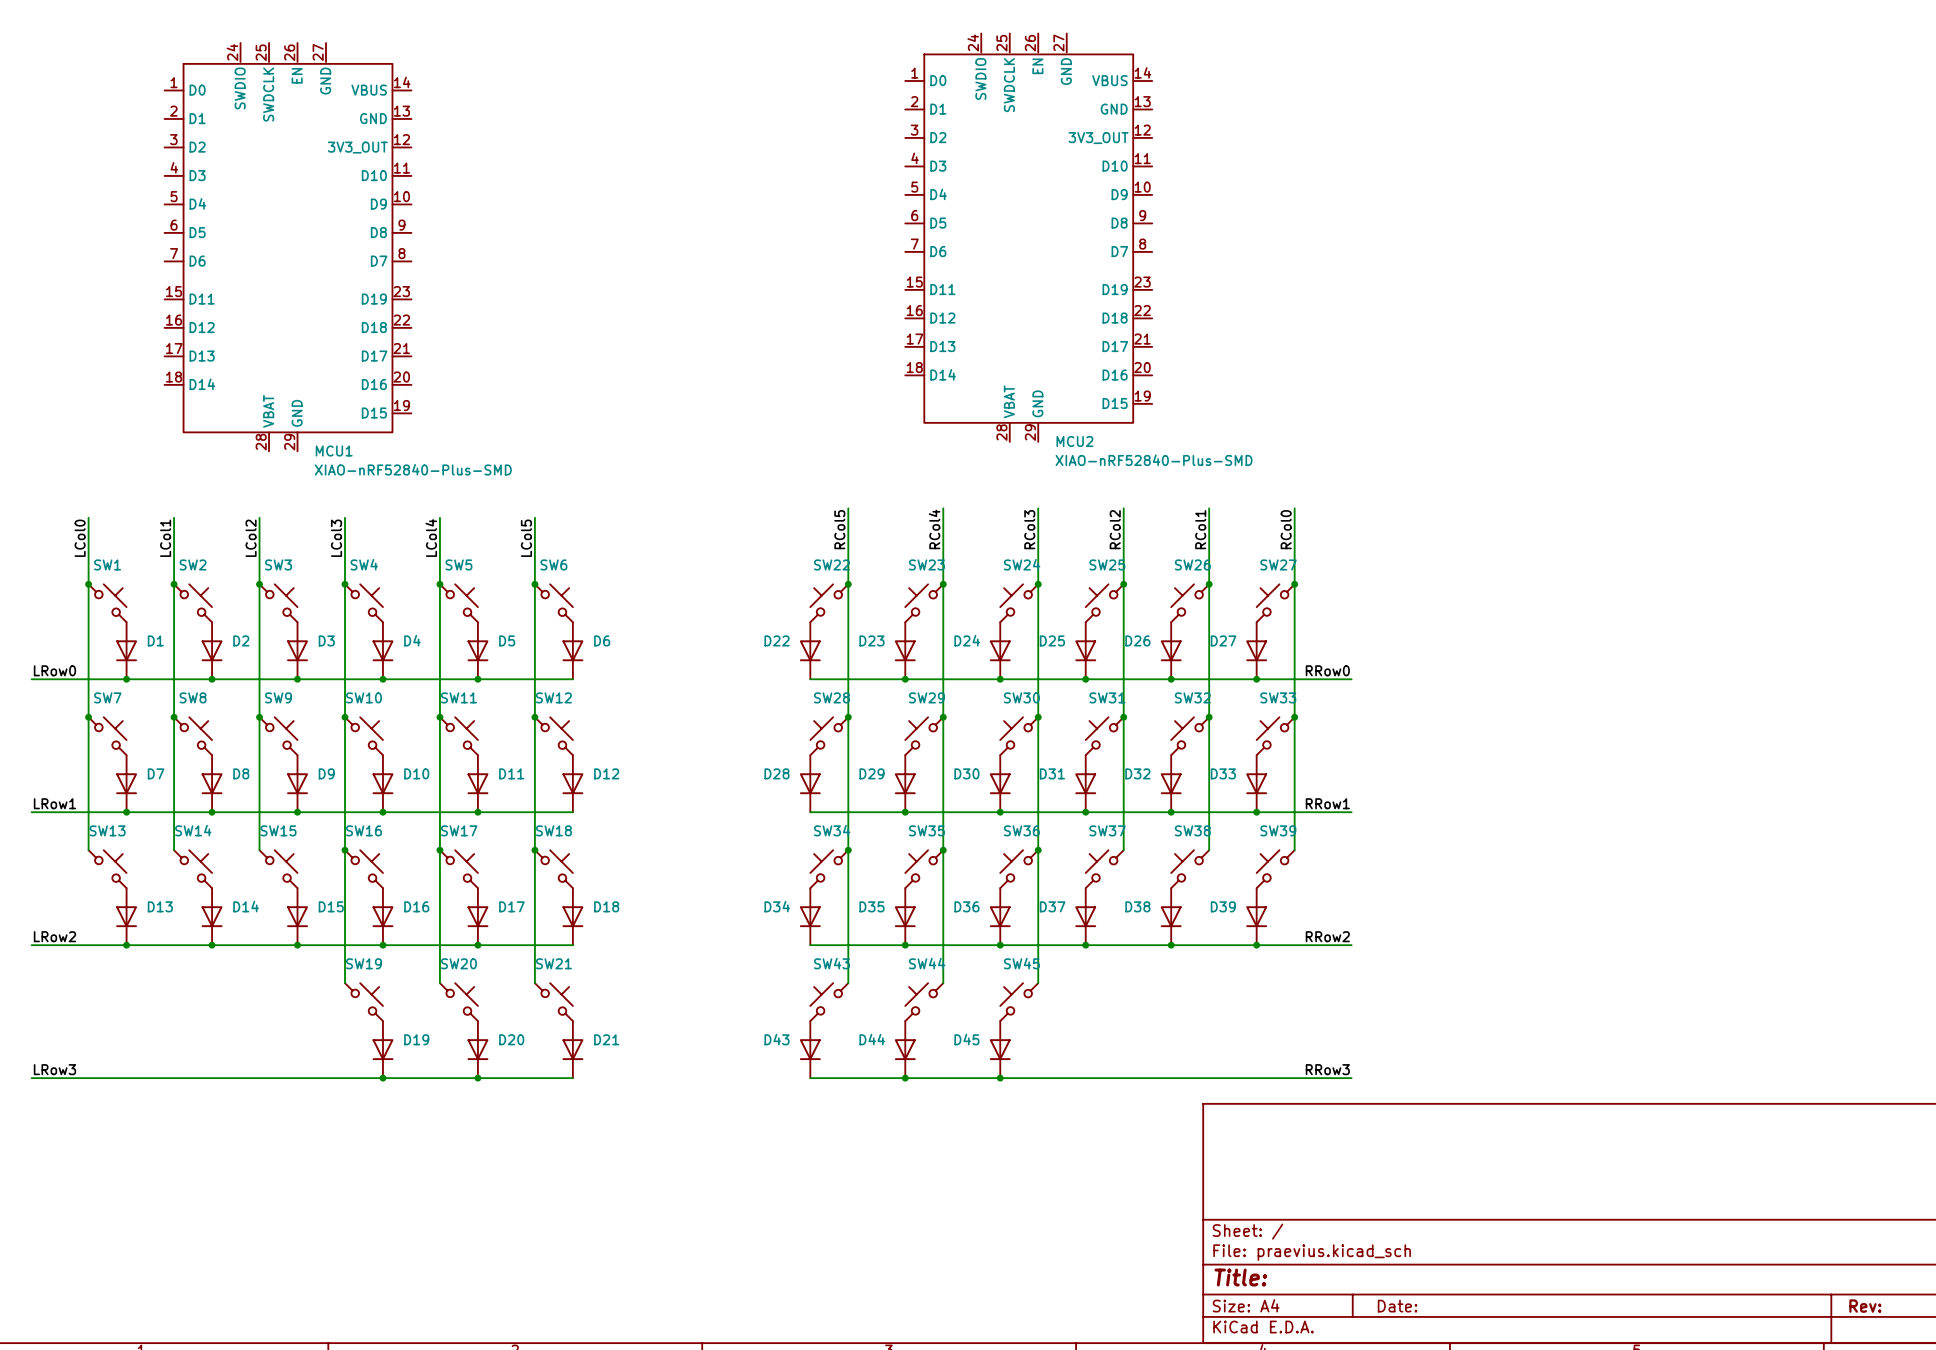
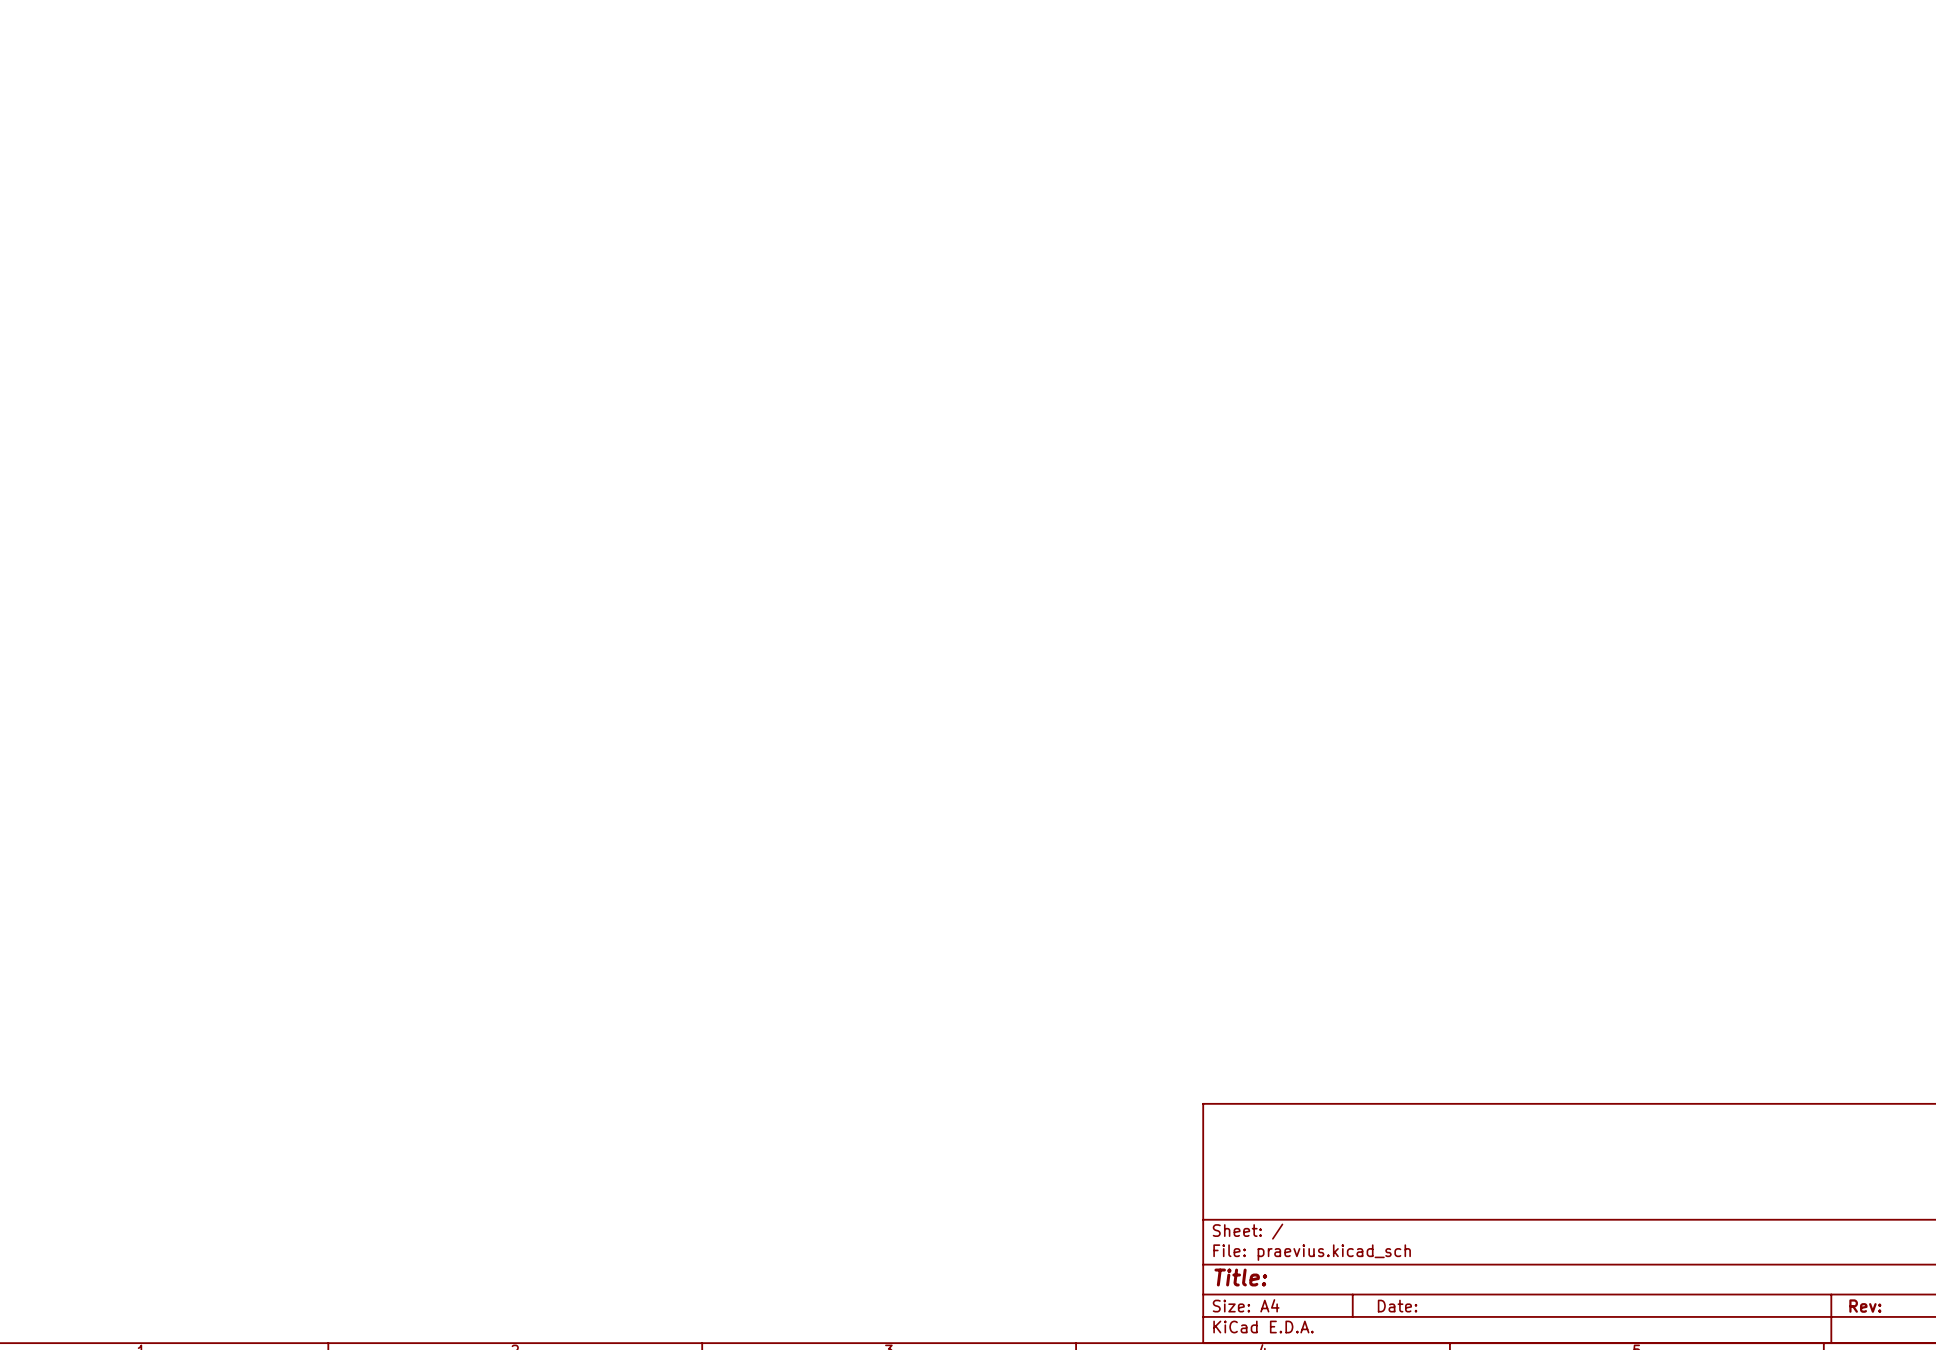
MCU2: XIAO-nRF52840-Plus-SMD (1028, 237) -> none
MCU1: XIAO-nRF52840-Plus-SMD (288, 247) -> none
wire: (848, 508) (848, 983) -> none
wire: (943, 508) (943, 983) -> none
wire: (1038, 508) (1038, 983) -> none
wire: (1123, 508) (1123, 850) -> none
wire: (1209, 508) (1209, 850) -> none
wire: (1294, 508) (1294, 850) -> none
wire: (88, 517) (88, 850) -> none
wire: (174, 517) (174, 850) -> none
wire: (259, 517) (259, 850) -> none
wire: (344, 517) (344, 983) -> none
wire: (439, 517) (439, 983) -> none
wire: (534, 517) (534, 983) -> none
label: RCol5 (839, 529) -> none
label: RCol4 (934, 529) -> none
label: RCol3 (1029, 529) -> none
label: RCol2 (1115, 529) -> none
label: RCol1 (1200, 529) -> none
label: RCol0 (1286, 529) -> none
label: LCol0 (80, 538) -> none
label: LCol1 (165, 538) -> none
label: LCol2 (251, 538) -> none
label: LCol3 (336, 538) -> none
label: LCol4 (431, 538) -> none
label: LCol5 (526, 538) -> none
junction: (88, 584) -> none
junction: (174, 584) -> none
junction: (259, 584) -> none
junction: (344, 584) -> none
junction: (439, 584) -> none
junction: (534, 584) -> none
junction: (848, 584) -> none
junction: (943, 584) -> none
junction: (1038, 584) -> none
junction: (1123, 584) -> none
junction: (1209, 584) -> none
junction: (1294, 584) -> none
SW1: (107, 603) -> none
SW2: (193, 603) -> none
SW3: (278, 603) -> none
SW4: (363, 603) -> none
SW5: (458, 603) -> none
SW6: (553, 603) -> none
SW22: (829, 603) -> none
SW23: (924, 603) -> none
SW24: (1019, 603) -> none
SW25: (1104, 603) -> none
SW26: (1190, 603) -> none
SW27: (1275, 603) -> none
D1: (126, 650) -> none
D2: (212, 650) -> none
D3: (297, 650) -> none
D4: (382, 650) -> none
D5: (477, 650) -> none
D6: (572, 650) -> none
D22: (810, 650) -> none
D23: (905, 650) -> none
D24: (1000, 650) -> none
D25: (1085, 650) -> none
D26: (1171, 650) -> none
D27: (1256, 650) -> none
label: LRow0 (54, 670) -> none
label: RRow0 (1327, 670) -> none
wire: (31, 679) (572, 679) -> none
junction: (126, 679) -> none
junction: (212, 679) -> none
junction: (297, 679) -> none
junction: (382, 679) -> none
junction: (477, 679) -> none
wire: (810, 679) (1351, 679) -> none
junction: (905, 679) -> none
junction: (1000, 679) -> none
junction: (1085, 679) -> none
junction: (1171, 679) -> none
junction: (1256, 679) -> none
junction: (88, 717) -> none
junction: (174, 717) -> none
junction: (259, 717) -> none
junction: (344, 717) -> none
junction: (439, 717) -> none
junction: (534, 717) -> none
junction: (848, 717) -> none
junction: (943, 717) -> none
junction: (1038, 717) -> none
junction: (1123, 717) -> none
junction: (1209, 717) -> none
junction: (1294, 717) -> none
SW7: (107, 736) -> none
SW8: (193, 736) -> none
SW9: (278, 736) -> none
SW10: (363, 736) -> none
SW11: (458, 736) -> none
SW12: (553, 736) -> none
SW28: (829, 736) -> none
SW29: (924, 736) -> none
SW30: (1019, 736) -> none
SW31: (1104, 736) -> none
SW32: (1190, 736) -> none
SW33: (1275, 736) -> none
D7: (126, 783) -> none
D8: (212, 783) -> none
D9: (297, 783) -> none
D10: (382, 783) -> none
D11: (477, 783) -> none
D12: (572, 783) -> none
D28: (810, 783) -> none
D29: (905, 783) -> none
D30: (1000, 783) -> none
D31: (1085, 783) -> none
D32: (1171, 783) -> none
D33: (1256, 783) -> none
label: LRow1 (54, 803) -> none
label: RRow1 (1327, 803) -> none
wire: (31, 812) (572, 812) -> none
junction: (126, 812) -> none
junction: (212, 812) -> none
junction: (297, 812) -> none
junction: (382, 812) -> none
junction: (477, 812) -> none
wire: (810, 812) (1351, 812) -> none
junction: (905, 812) -> none
junction: (1000, 812) -> none
junction: (1085, 812) -> none
junction: (1171, 812) -> none
junction: (1256, 812) -> none
junction: (344, 850) -> none
junction: (439, 850) -> none
junction: (534, 850) -> none
junction: (848, 850) -> none
junction: (943, 850) -> none
junction: (1038, 850) -> none
SW13: (107, 869) -> none
SW14: (193, 869) -> none
SW15: (278, 869) -> none
SW16: (363, 869) -> none
SW17: (458, 869) -> none
SW18: (553, 869) -> none
SW34: (829, 869) -> none
SW35: (924, 869) -> none
SW36: (1019, 869) -> none
SW37: (1104, 869) -> none
SW38: (1190, 869) -> none
SW39: (1275, 869) -> none
D13: (126, 916) -> none
D14: (212, 916) -> none
D15: (297, 916) -> none
D16: (382, 916) -> none
D17: (477, 916) -> none
D18: (572, 916) -> none
D34: (810, 916) -> none
D35: (905, 916) -> none
D36: (1000, 916) -> none
D37: (1085, 916) -> none
D38: (1171, 916) -> none
D39: (1256, 916) -> none
label: LRow2 (54, 936) -> none
label: RRow2 (1327, 936) -> none
wire: (31, 945) (572, 945) -> none
junction: (126, 945) -> none
junction: (212, 945) -> none
junction: (297, 945) -> none
junction: (382, 945) -> none
junction: (477, 945) -> none
wire: (810, 945) (1351, 945) -> none
junction: (905, 945) -> none
junction: (1000, 945) -> none
junction: (1085, 945) -> none
junction: (1171, 945) -> none
junction: (1256, 945) -> none
SW19: (363, 1002) -> none
SW20: (458, 1002) -> none
SW21: (553, 1002) -> none
SW43: (829, 1002) -> none
SW44: (924, 1002) -> none
SW45: (1019, 1002) -> none
D19: (382, 1049) -> none
D20: (477, 1049) -> none
D21: (572, 1049) -> none
D43: (810, 1049) -> none
D44: (905, 1049) -> none
D45: (1000, 1049) -> none
label: LRow3 (54, 1069) -> none
label: RRow3 (1327, 1069) -> none
wire: (31, 1078) (572, 1078) -> none
junction: (382, 1078) -> none
junction: (477, 1078) -> none
wire: (810, 1078) (1351, 1078) -> none
junction: (905, 1078) -> none
junction: (1000, 1078) -> none

